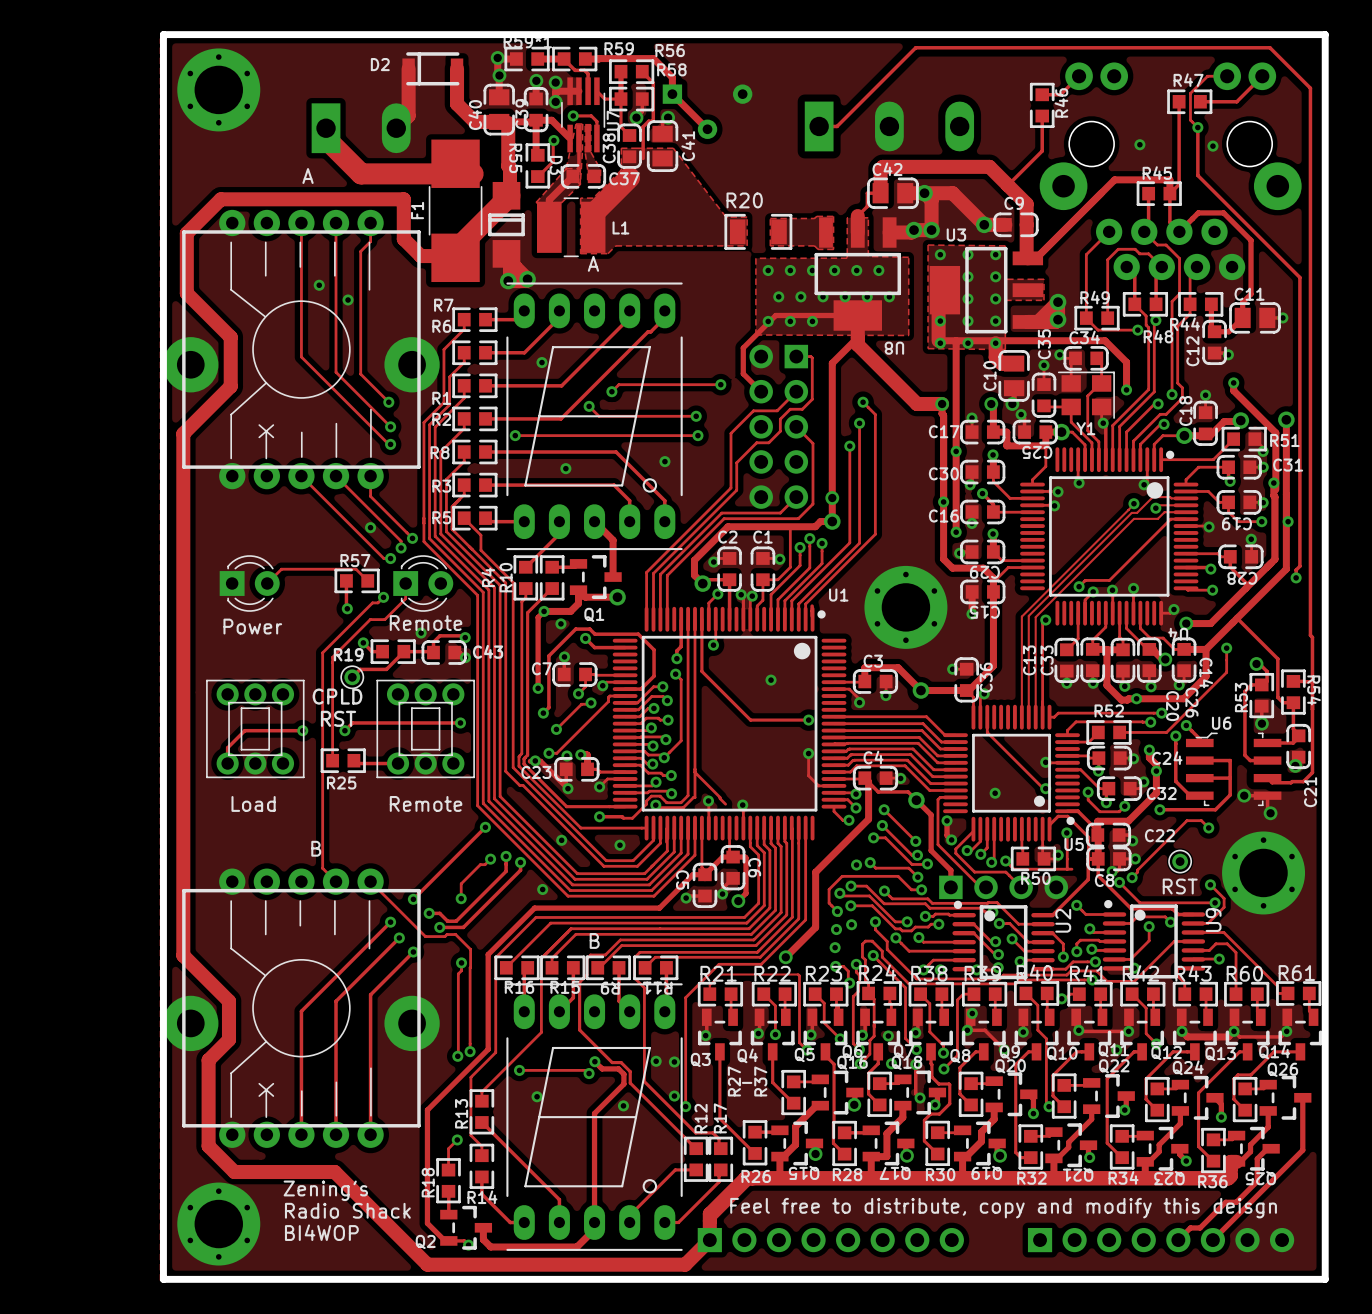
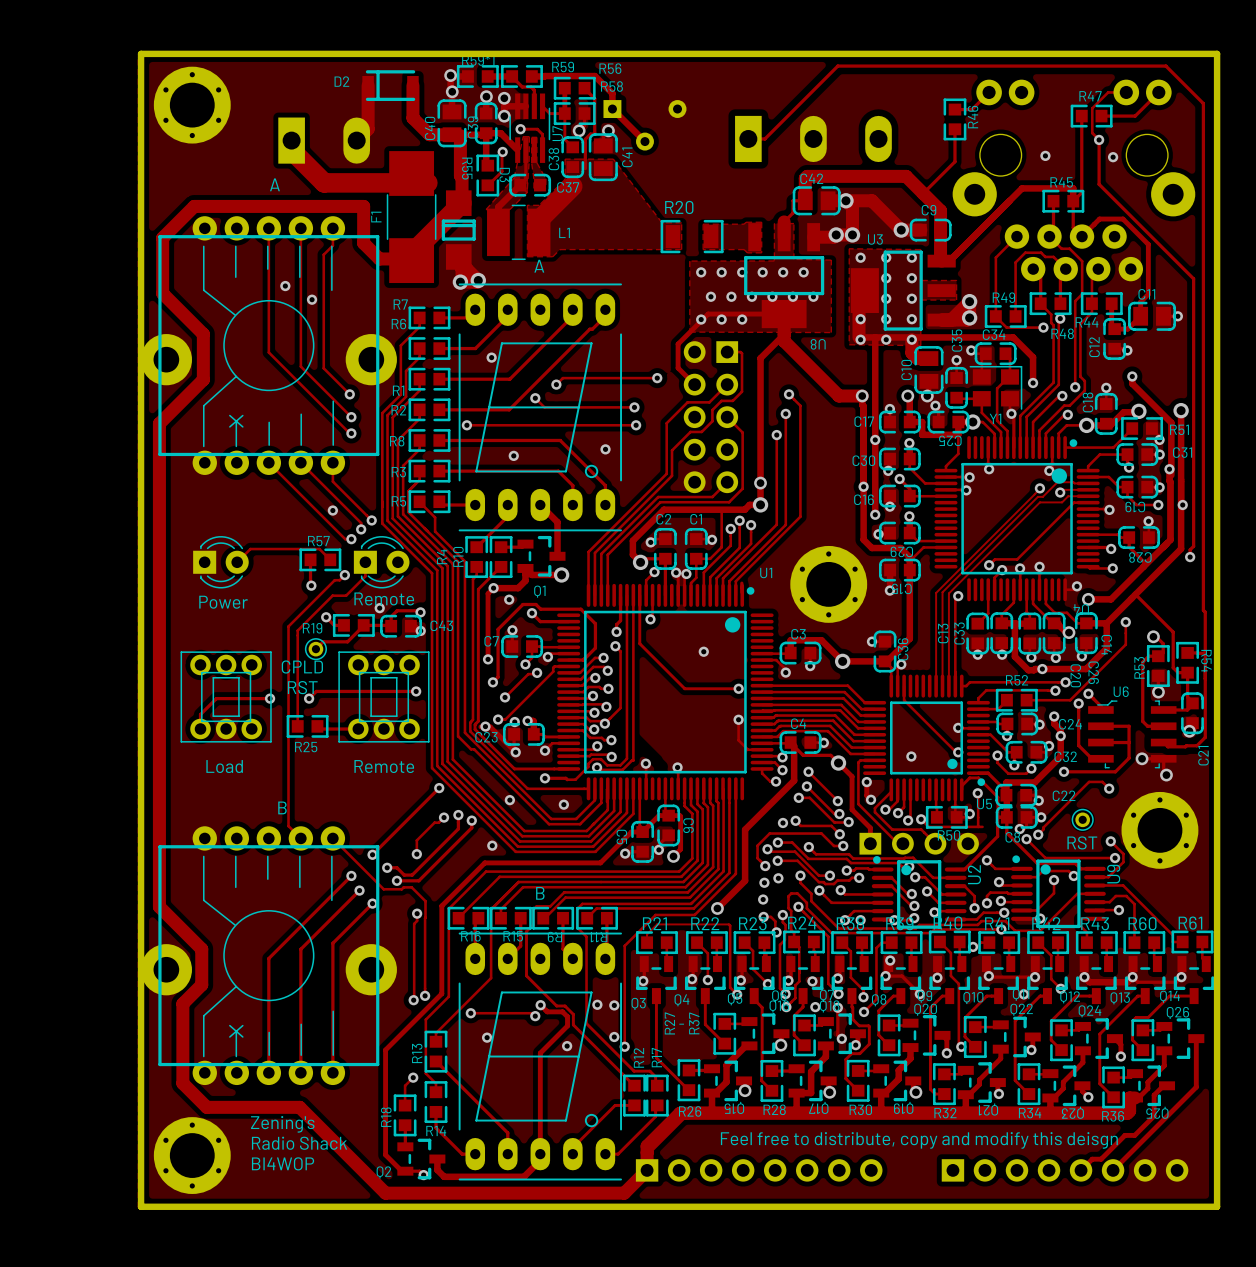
track: (694, 772) (725, 804) -> none

